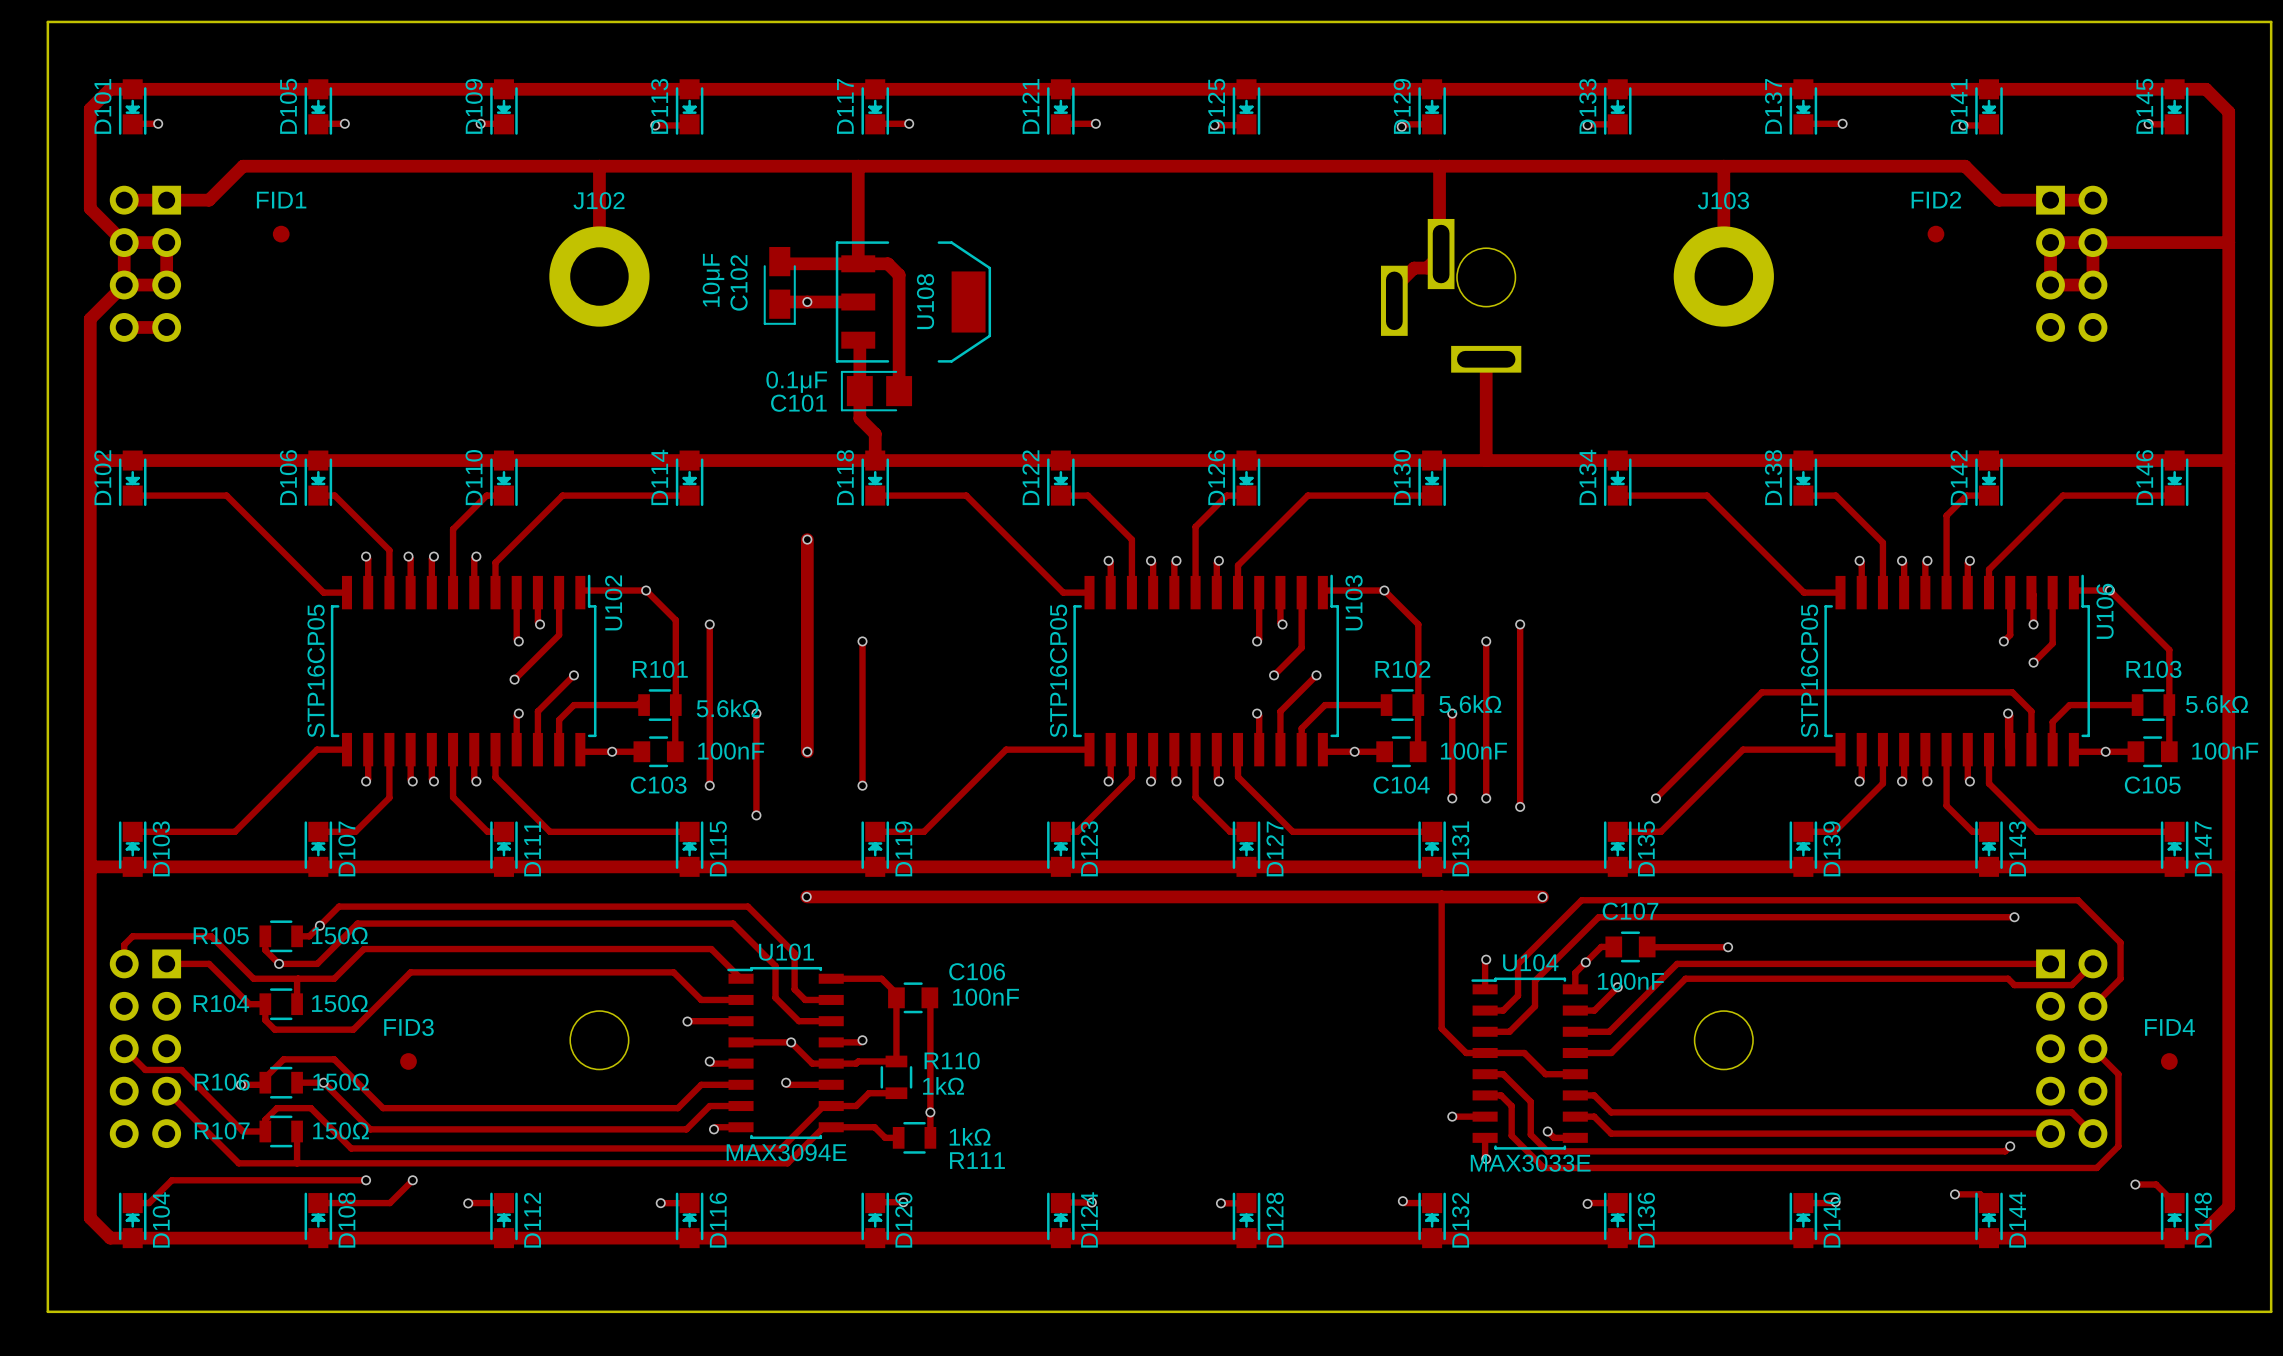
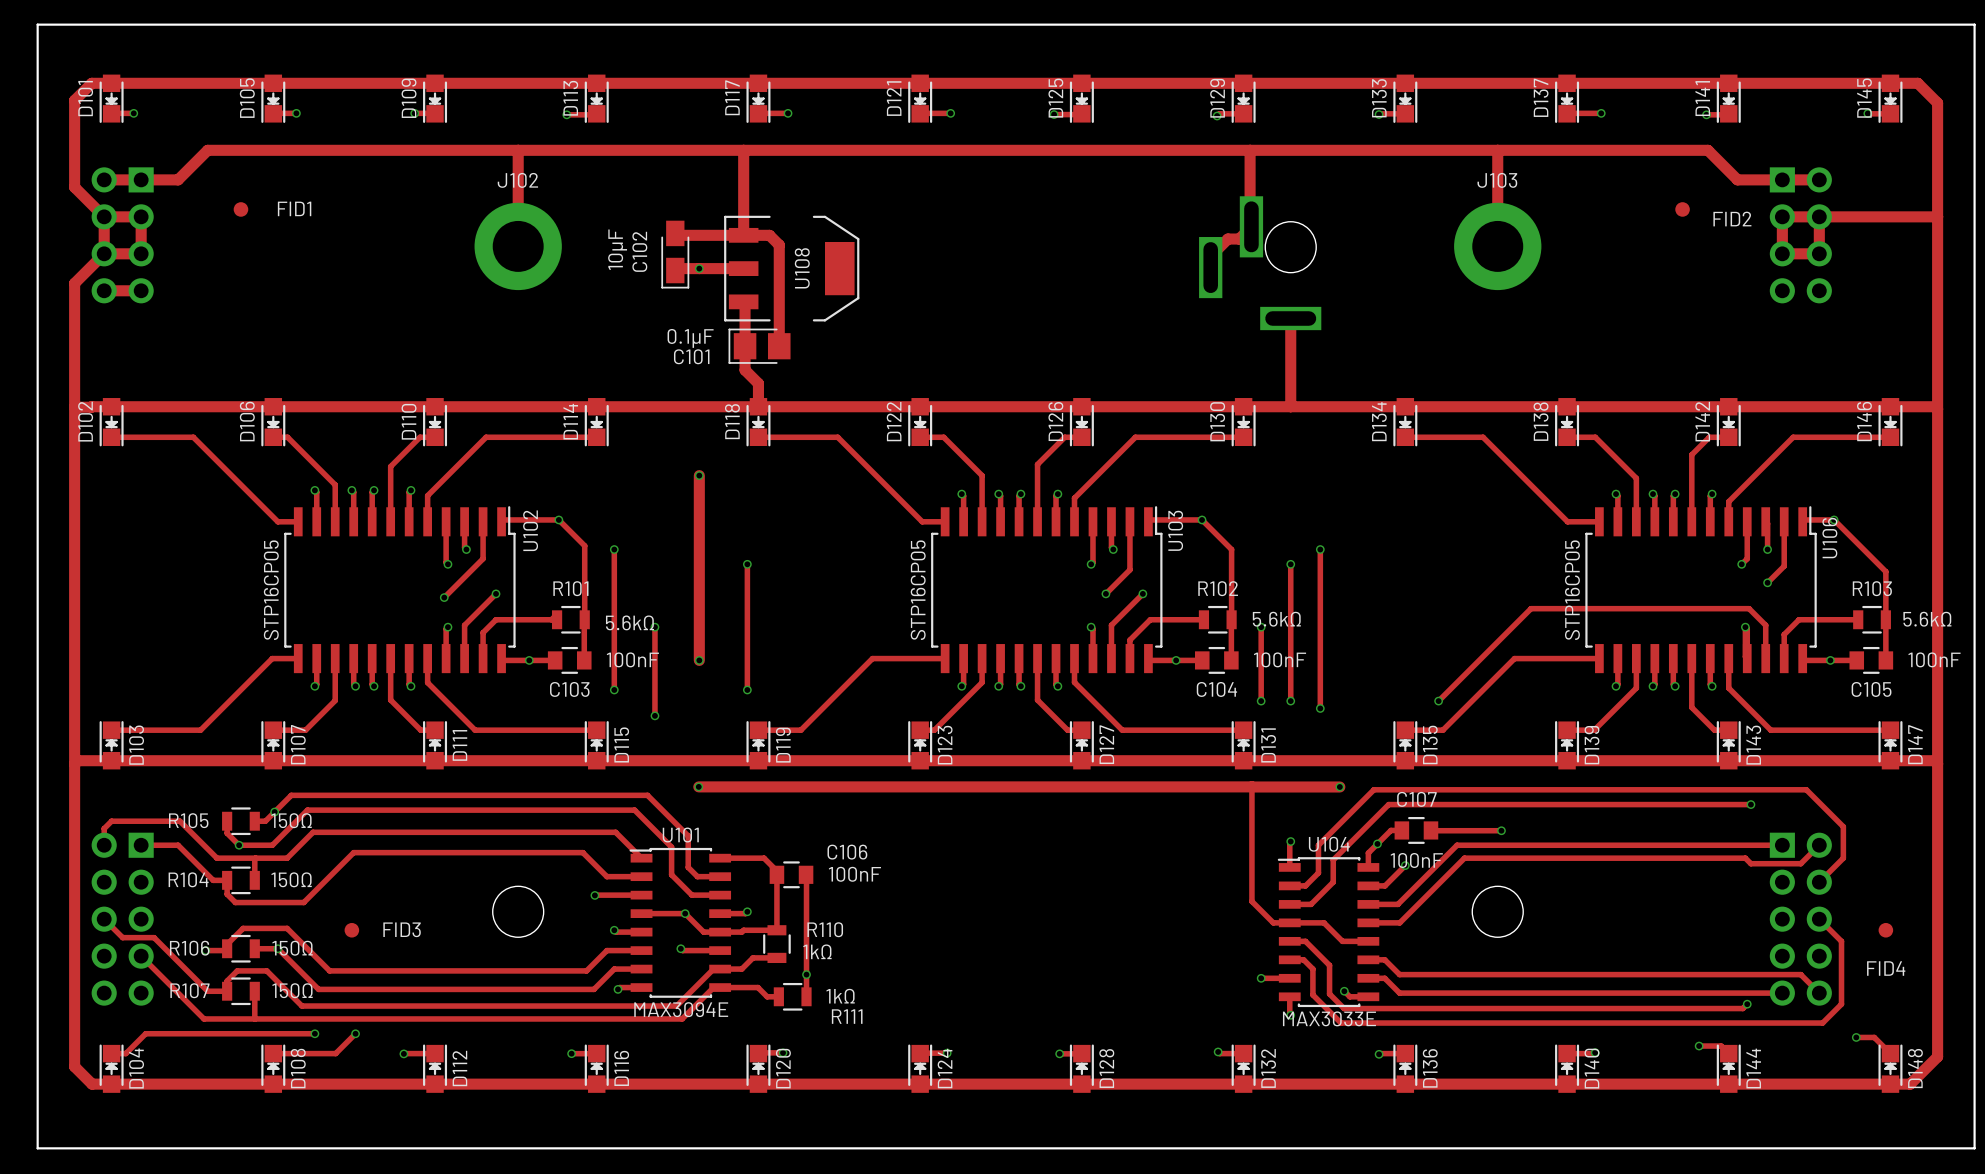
FID2 name position: FID2 (1936, 199) -> FID2 (1732, 219)
FID1 name position: FID1 (281, 200) -> FID1 (294, 208)
FID3 name position: FID3 (408, 1027) -> FID3 (402, 929)
FID4 name position: FID4 (2169, 1027) -> FID4 (1886, 968)

